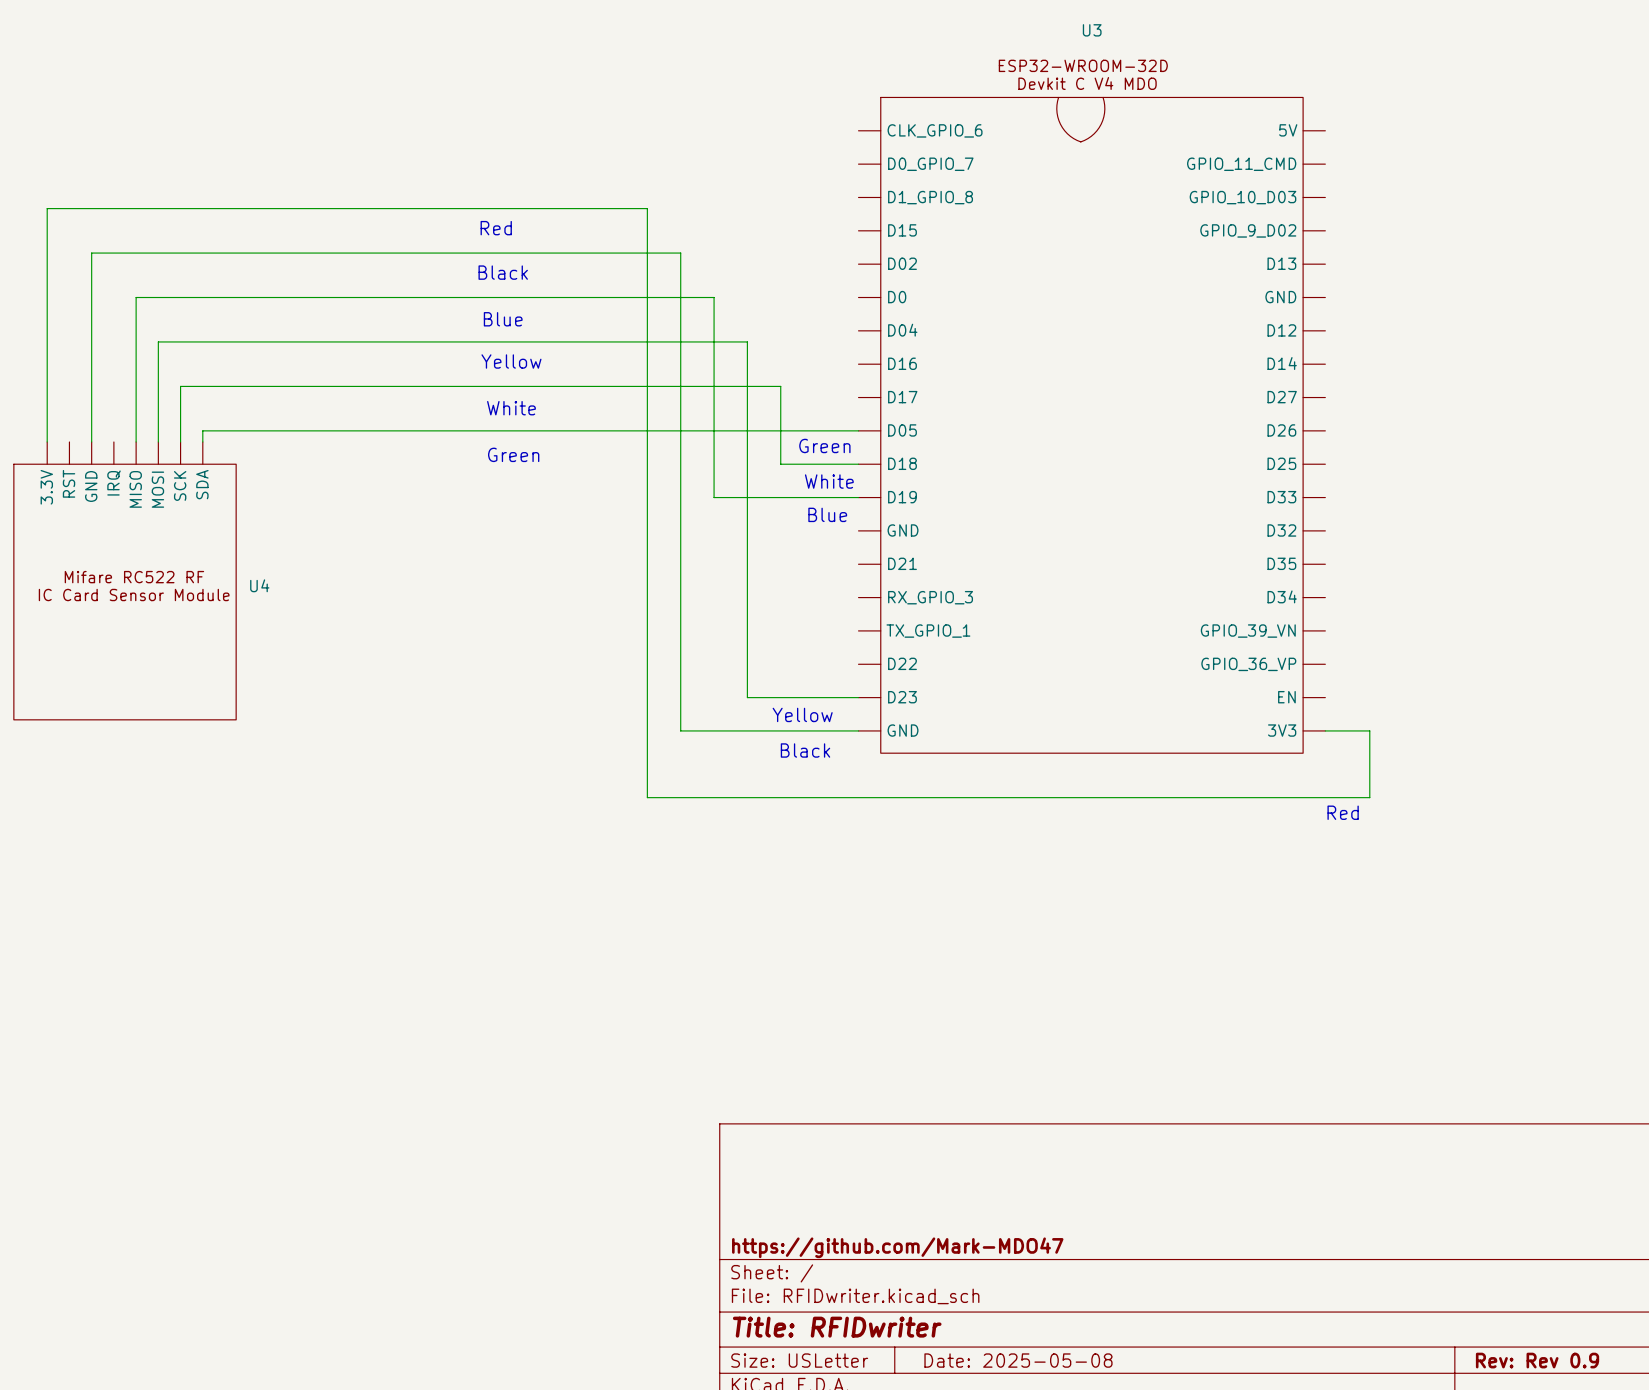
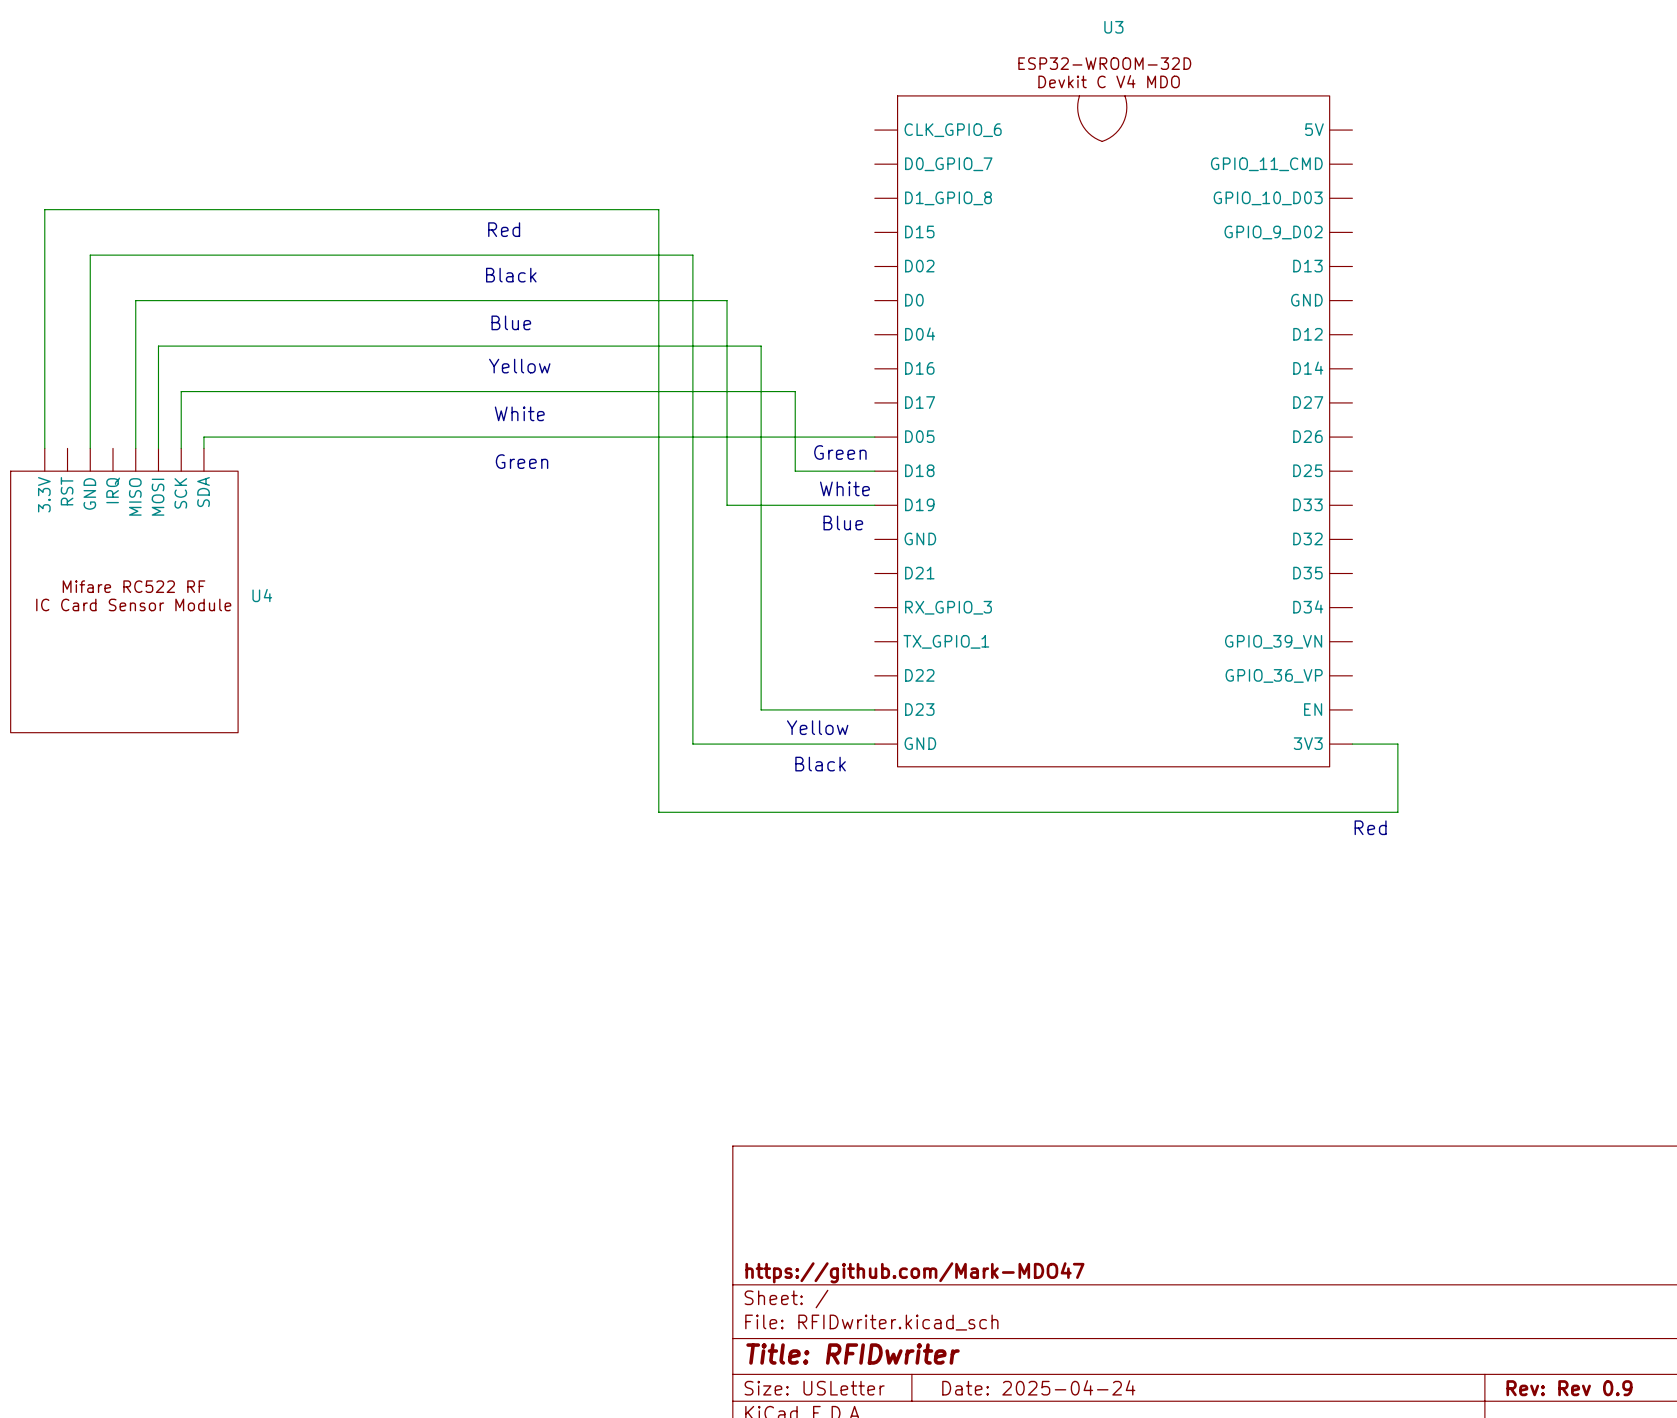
title block: Date: 2025-05-08 (1018, 1360) -> Date: 2025-04-24 (1038, 1387)

